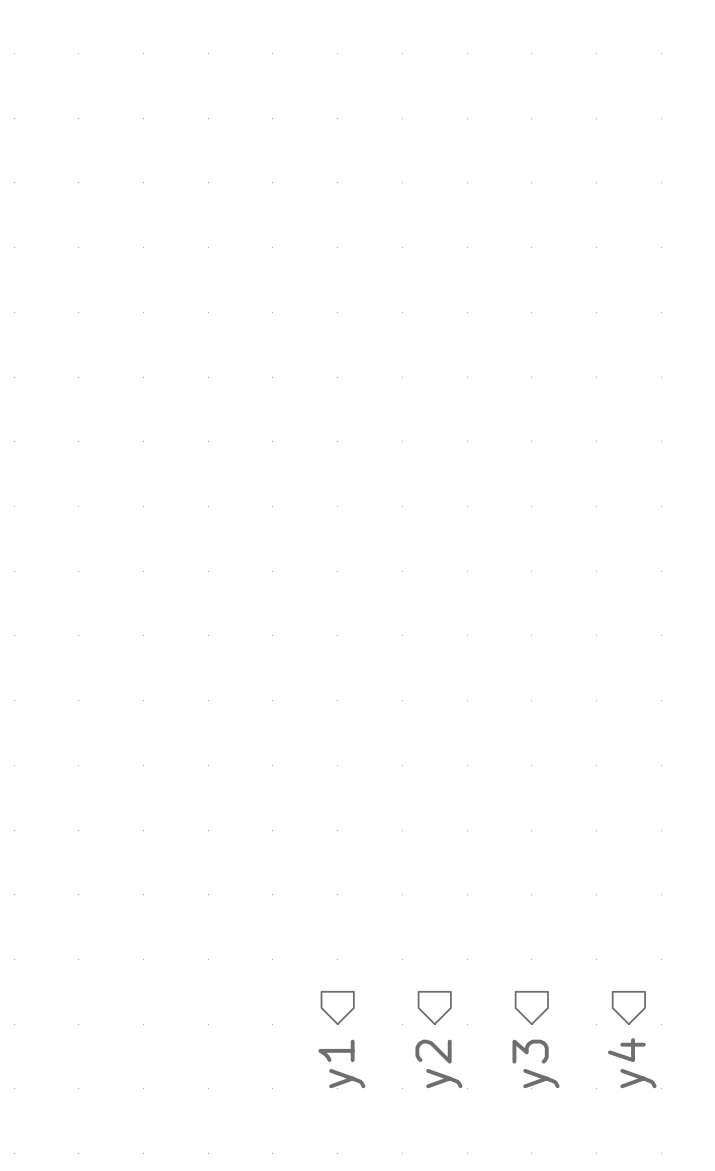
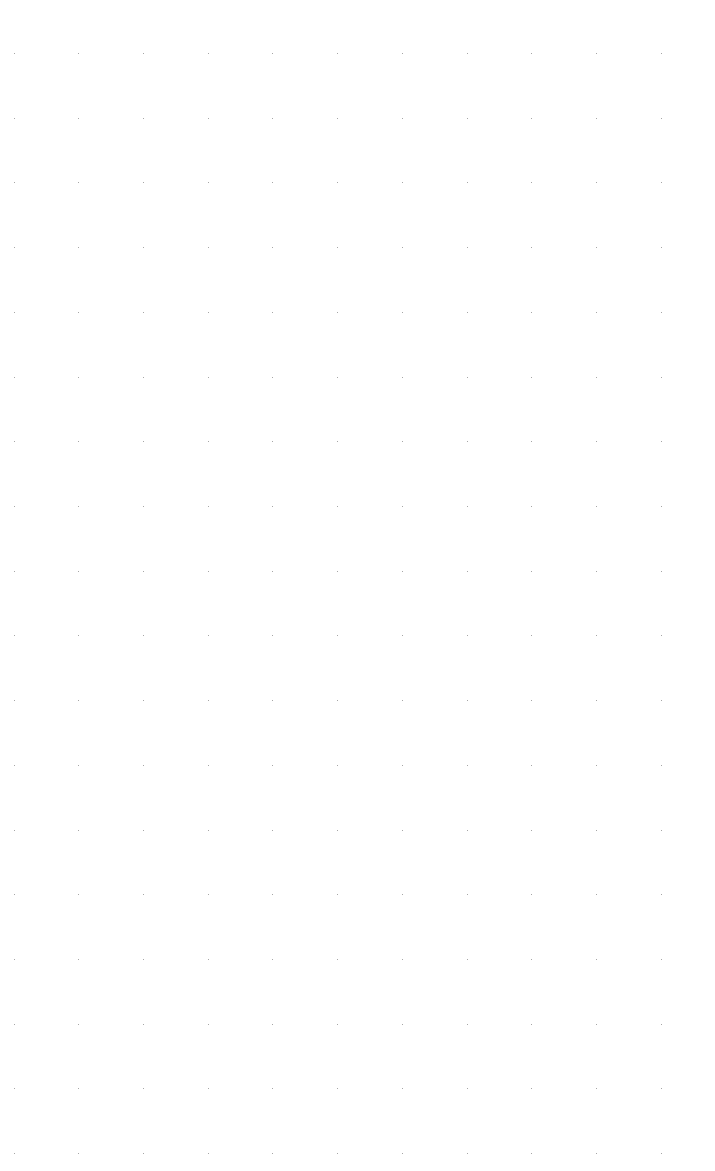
hierarchical label: y1 (341, 1063) -> none
hierarchical label: y2 (438, 1063) -> none
hierarchical label: y3 (535, 1063) -> none
hierarchical label: y4 (632, 1063) -> none

